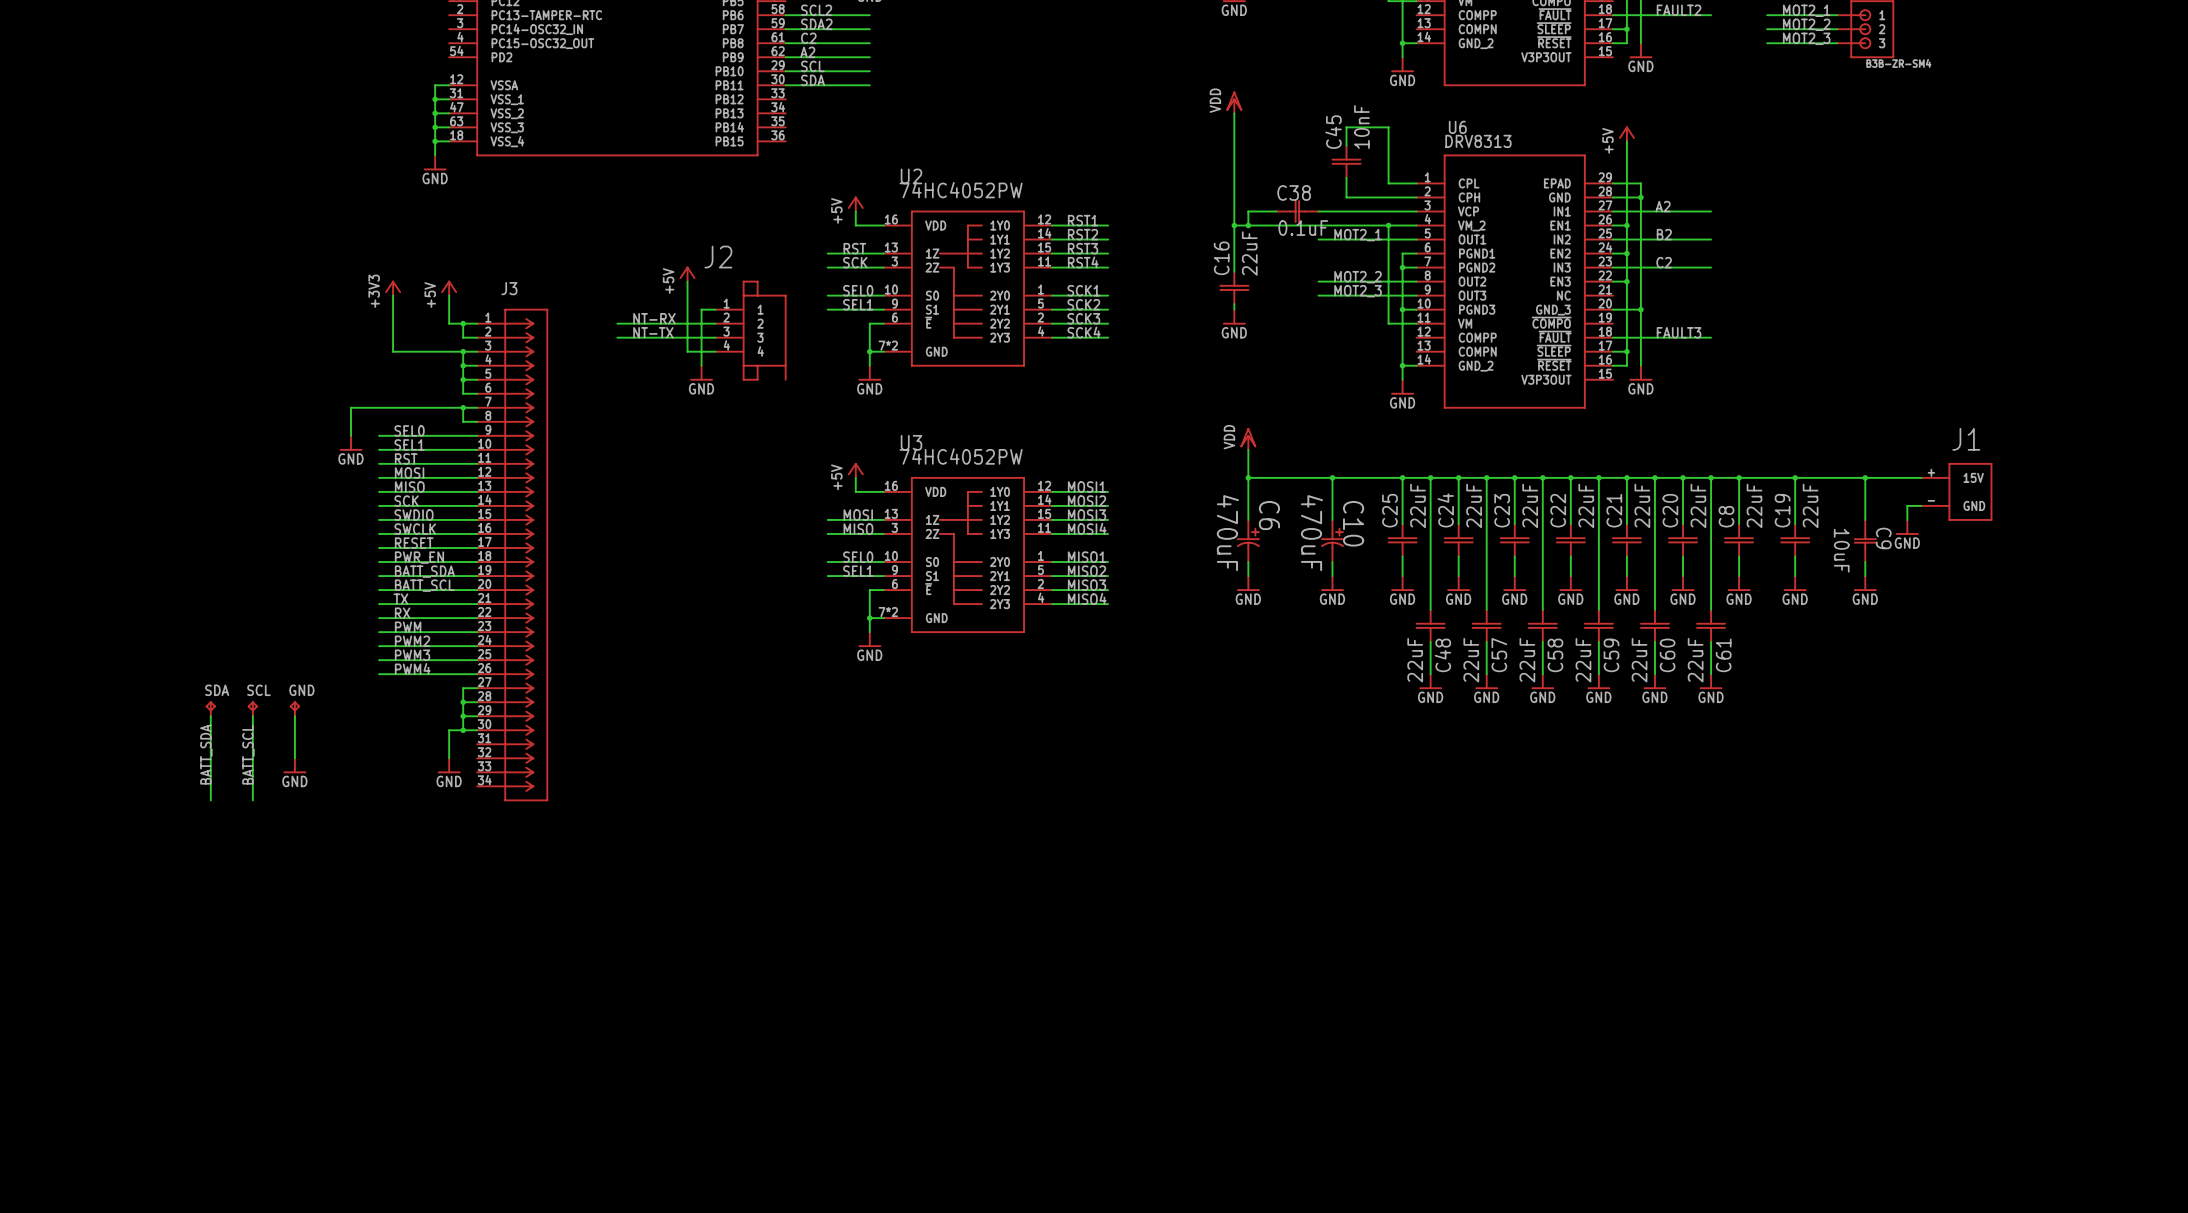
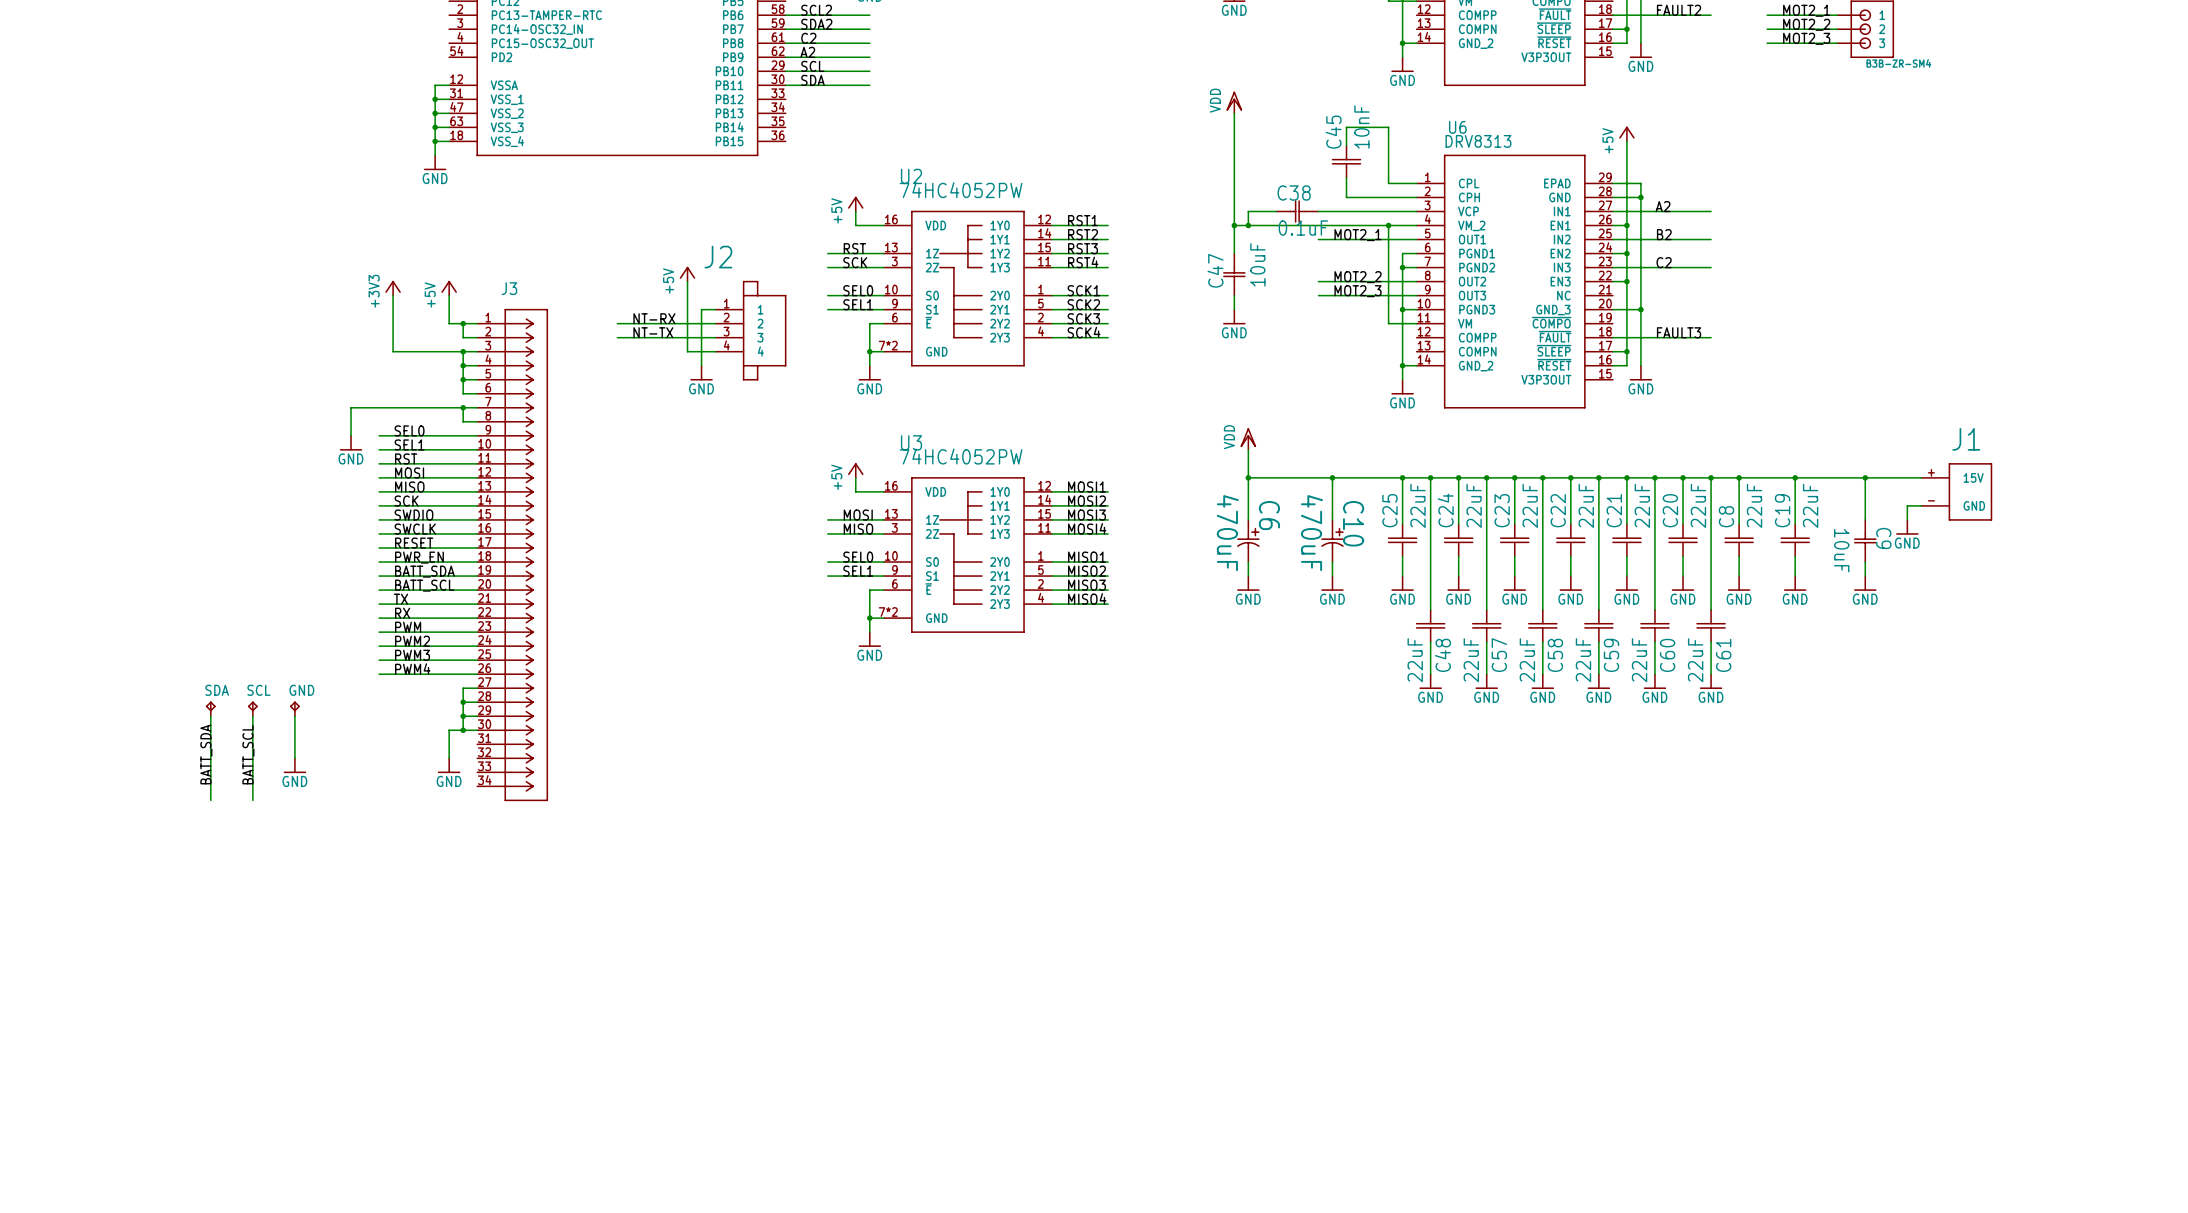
C47: none -> 10uF (1234, 274)
J2 symbol: [715, 280, 787, 381] -> [715, 280, 787, 381]
C16: 22uF (1234, 287) -> none

